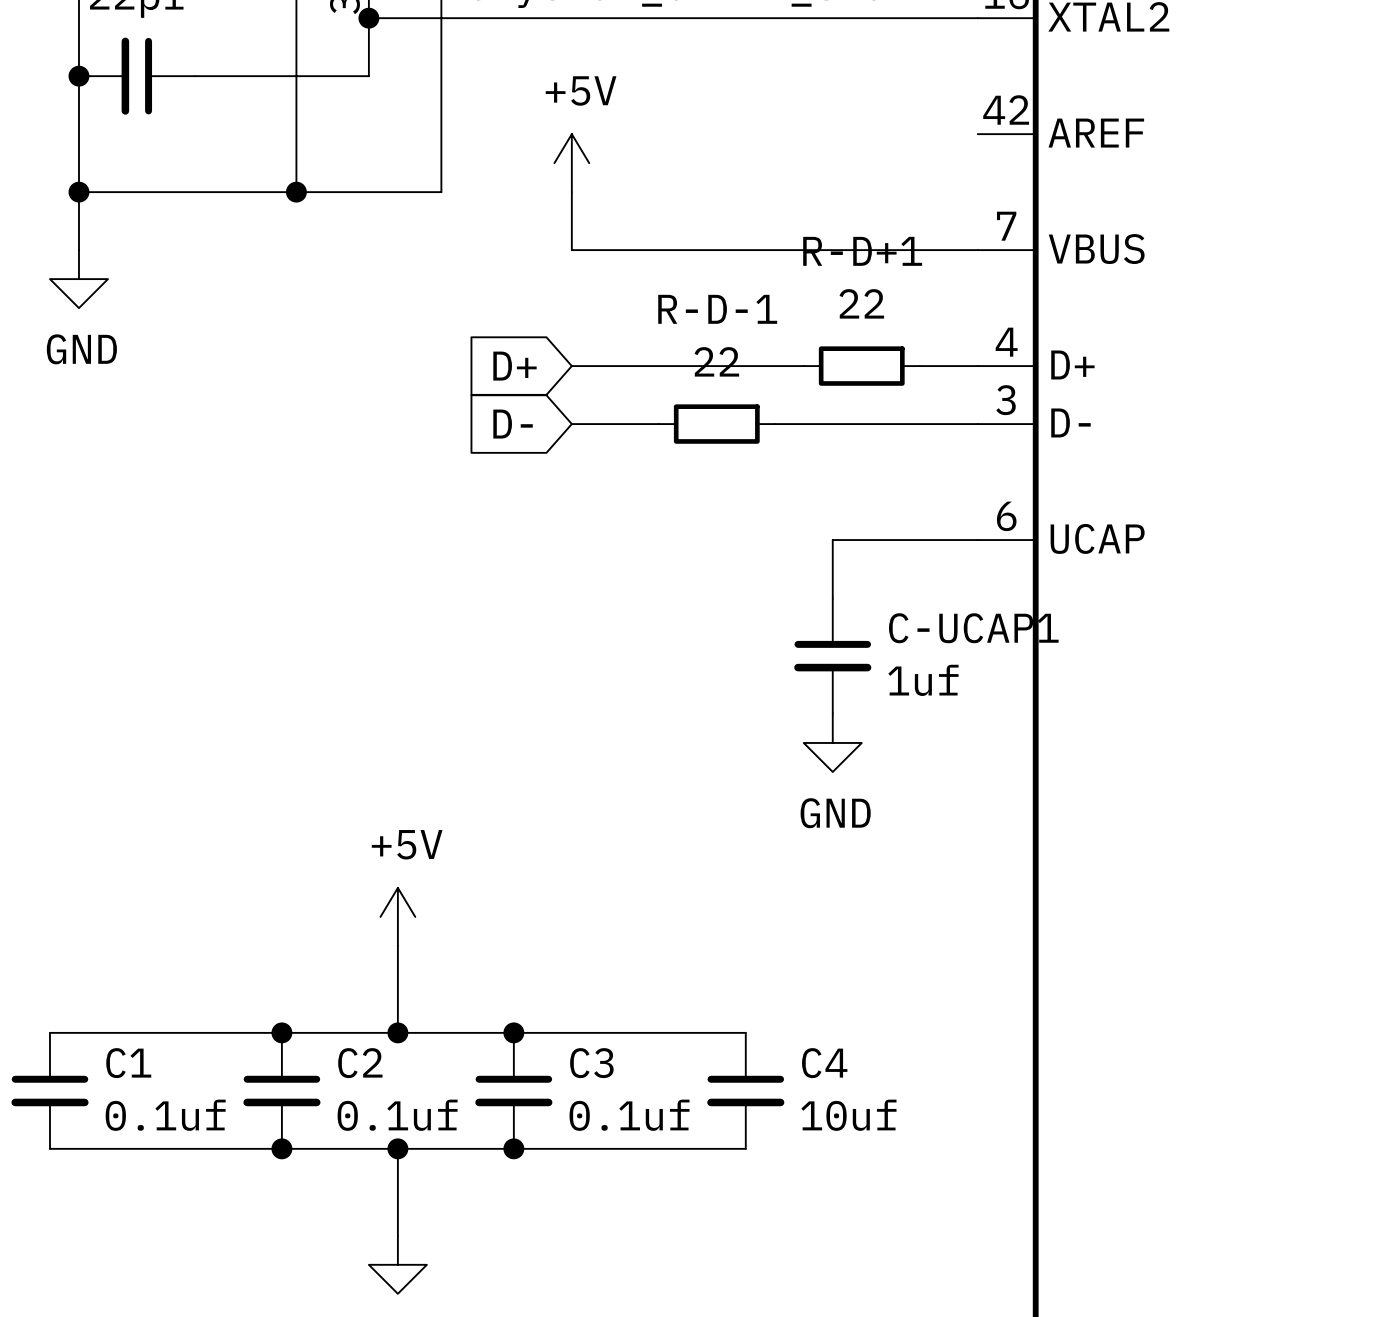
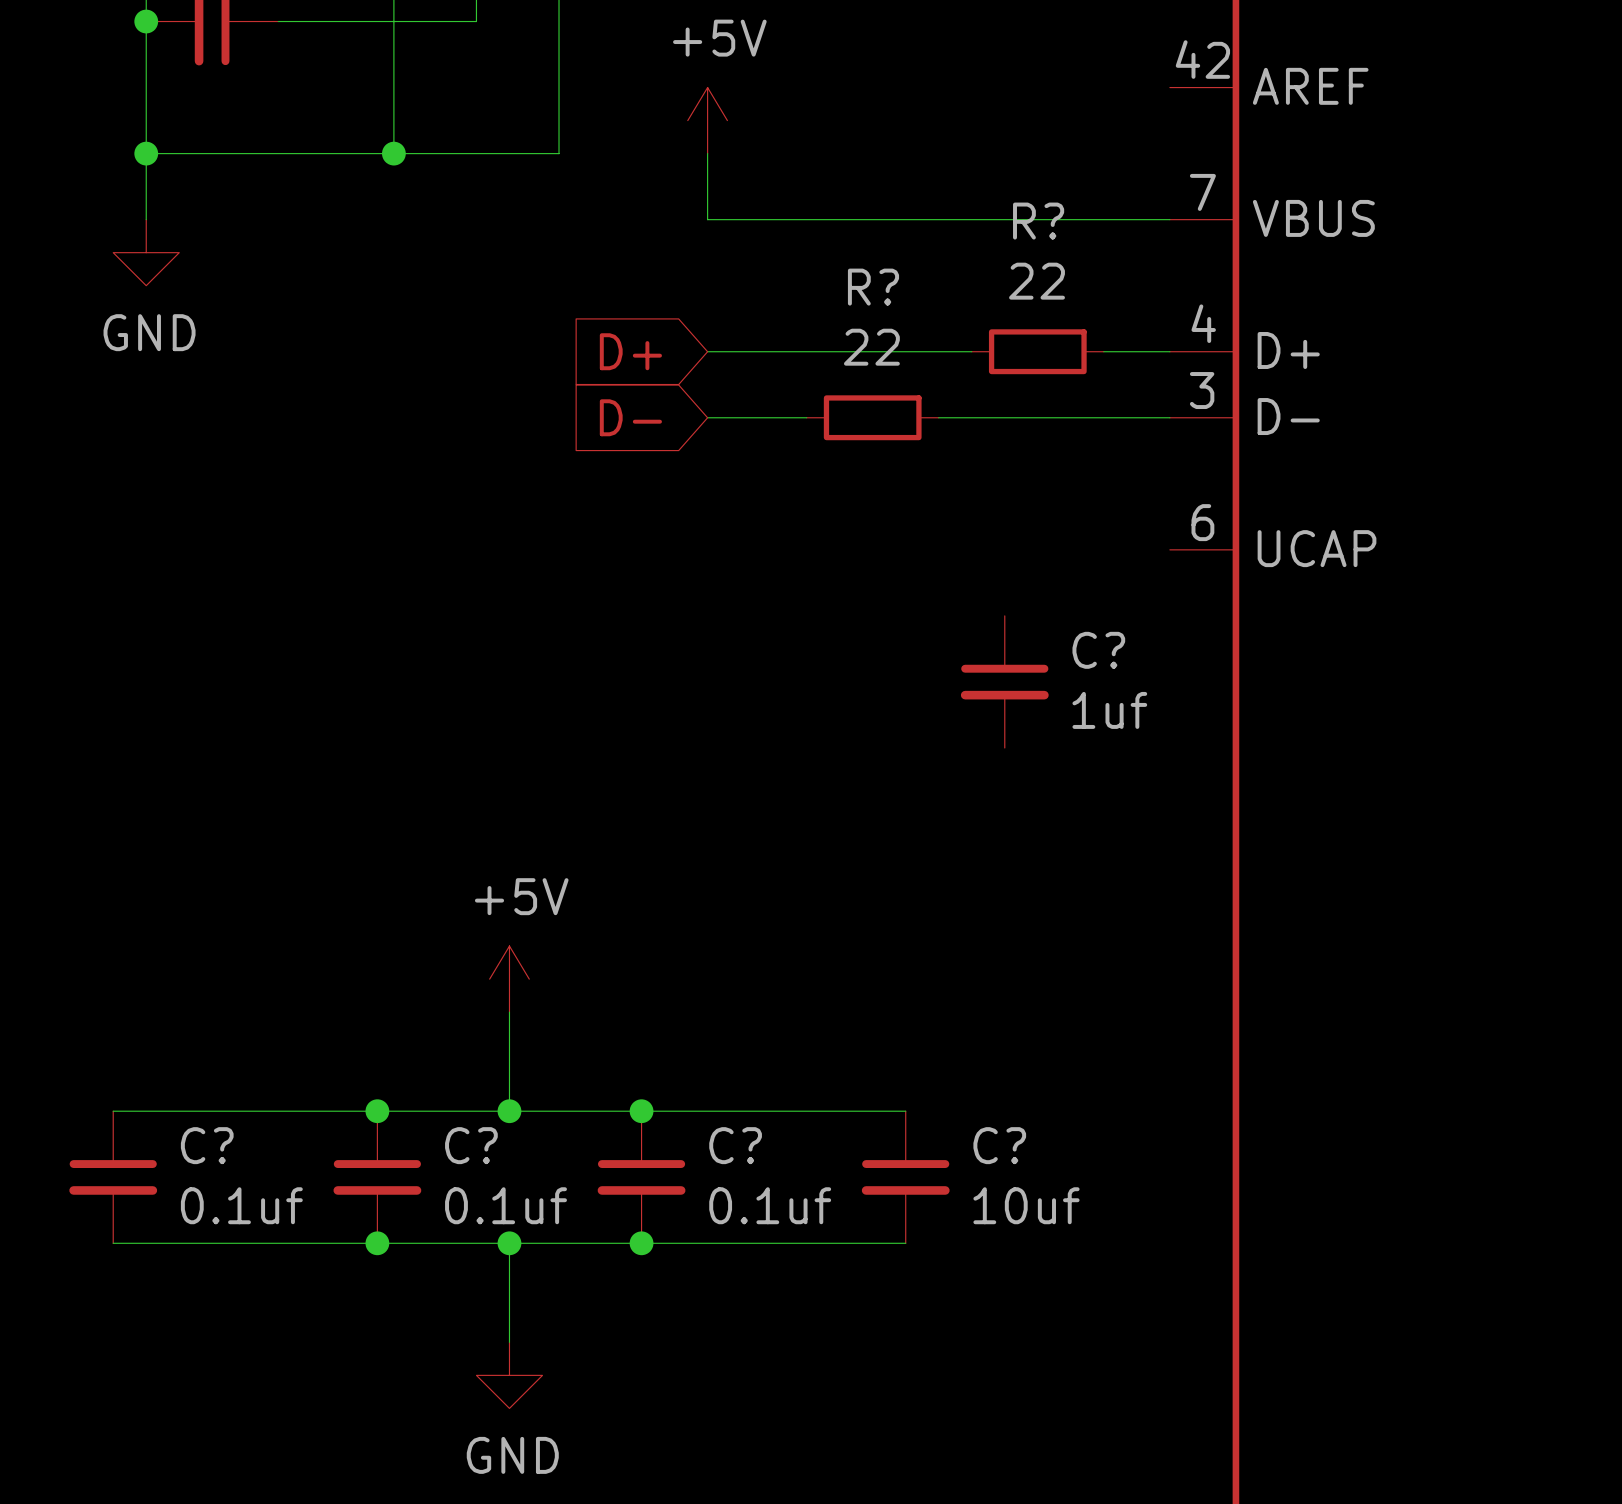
R-D+1 name: R-D+1 (862, 251) -> R? (1038, 221)
R-D-1 name: R-D-1 (717, 309) -> R? (873, 287)
wire: (977, 540) (832, 540) (832, 598) -> none
C-UCAP1 name: C-UCAP1 (973, 628) -> C? (1098, 650)
power symbol: GND (832, 742) -> none
C1 name: C1 (128, 1063) -> C? (207, 1145)
C2 name: C2 (360, 1063) -> C? (471, 1145)
C3 name: C3 (591, 1063) -> C? (735, 1145)
C4 name: C4 (824, 1063) -> C? (999, 1145)

